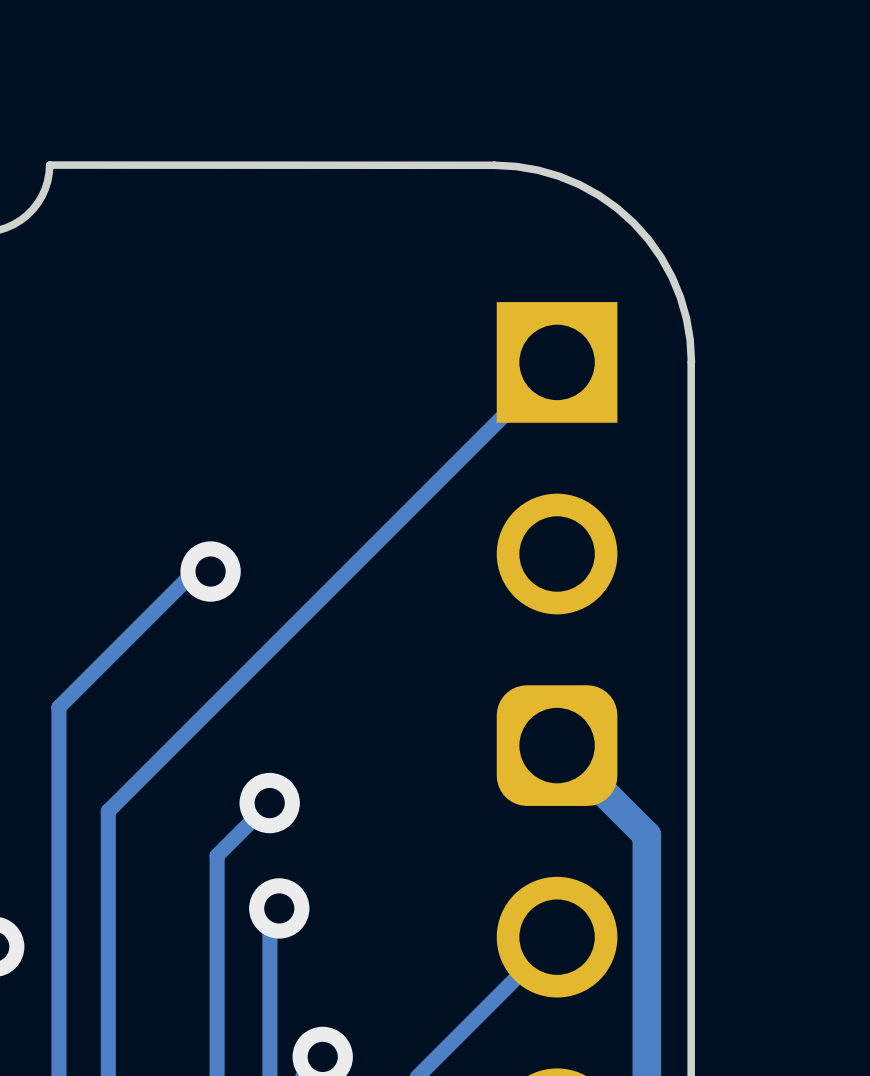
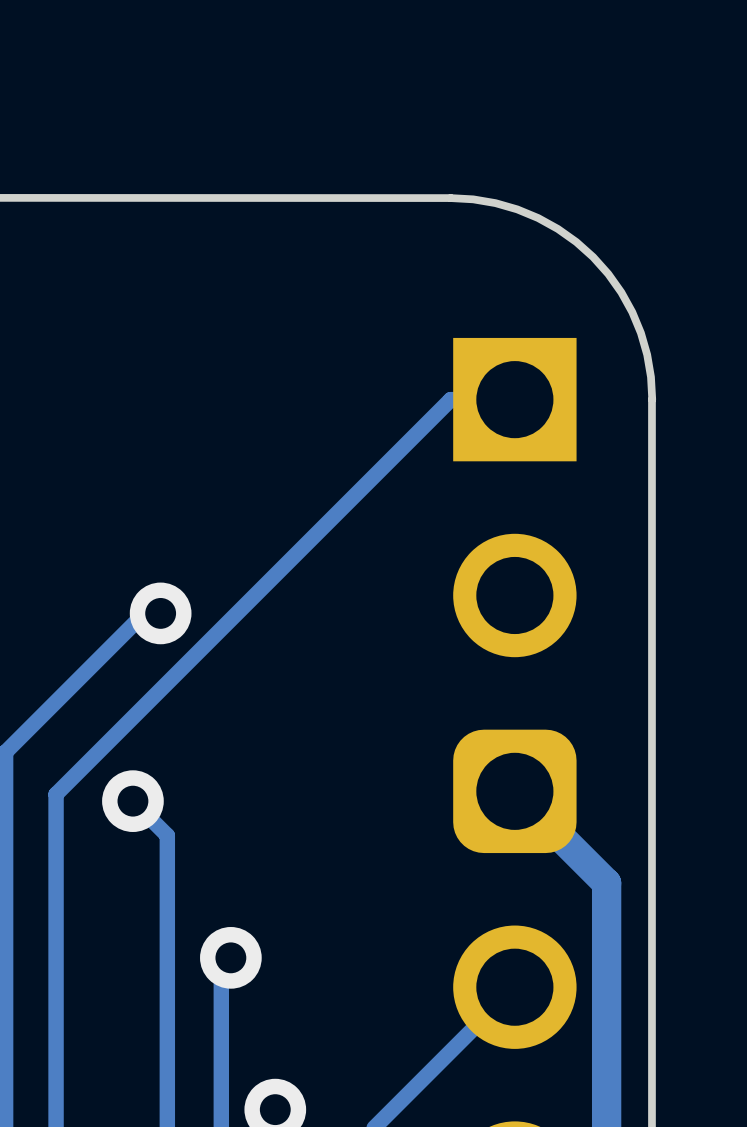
track: (557, 362) (108, 811) -> (514, 399) (450, 399) (56, 794) (56, 858)
track: (269, 803) (217, 855) -> (132, 801) (167, 835) (167, 903)
via position: (269, 803) -> (132, 801)

